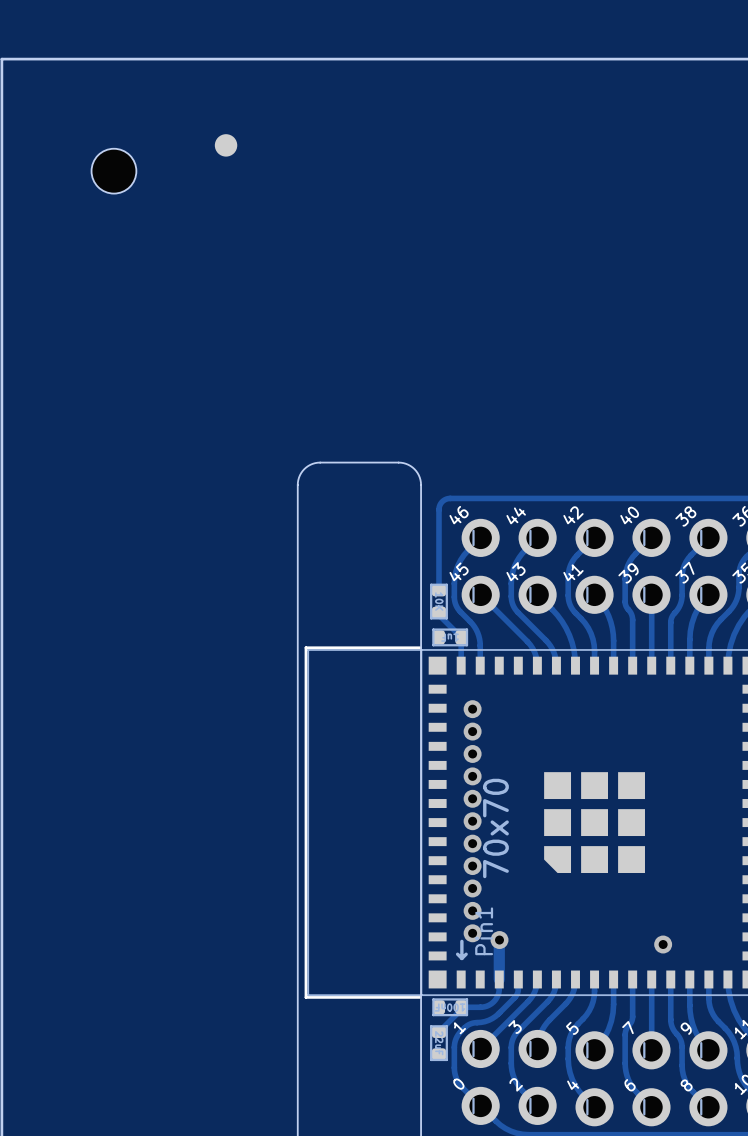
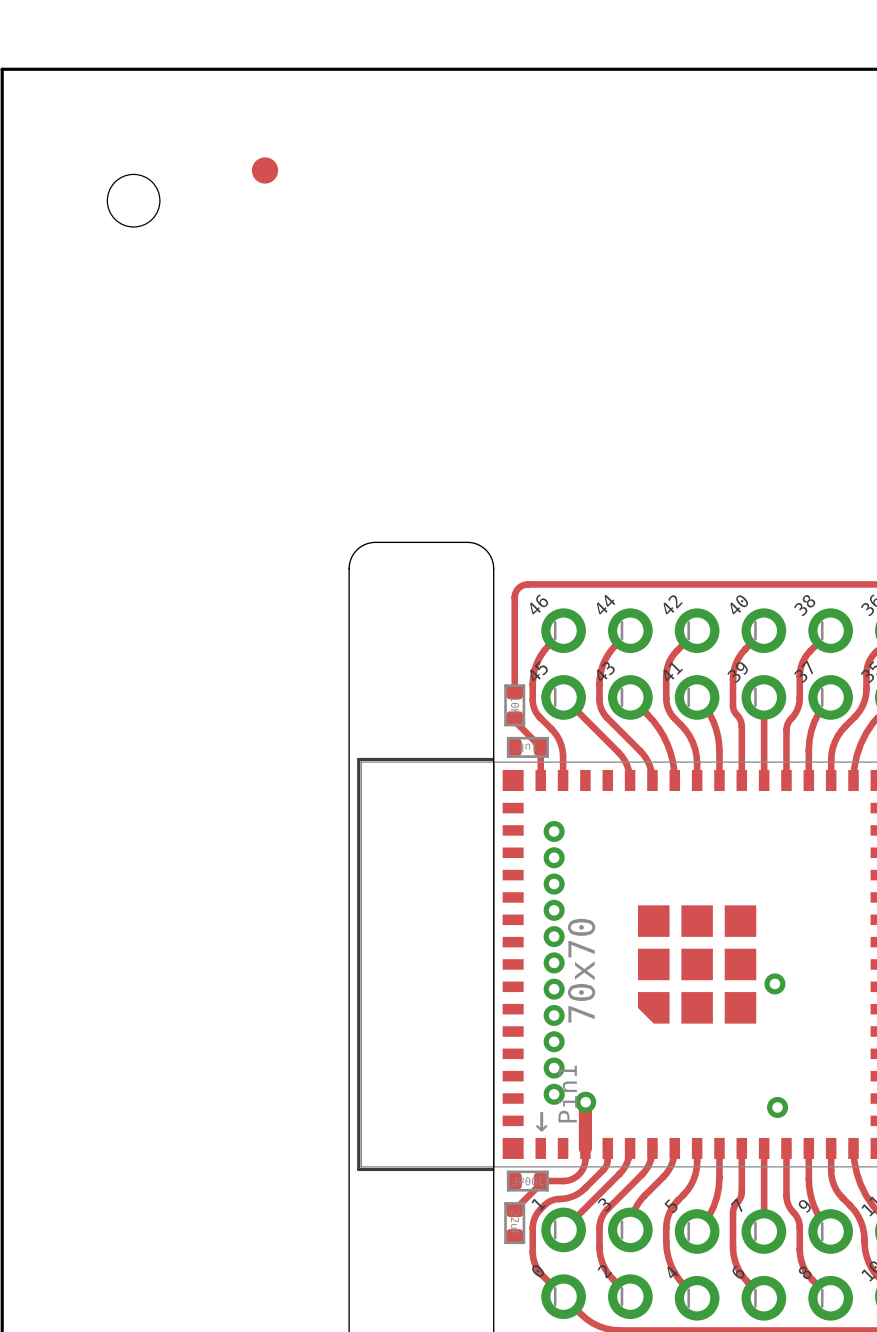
via: none -> (774, 983)

